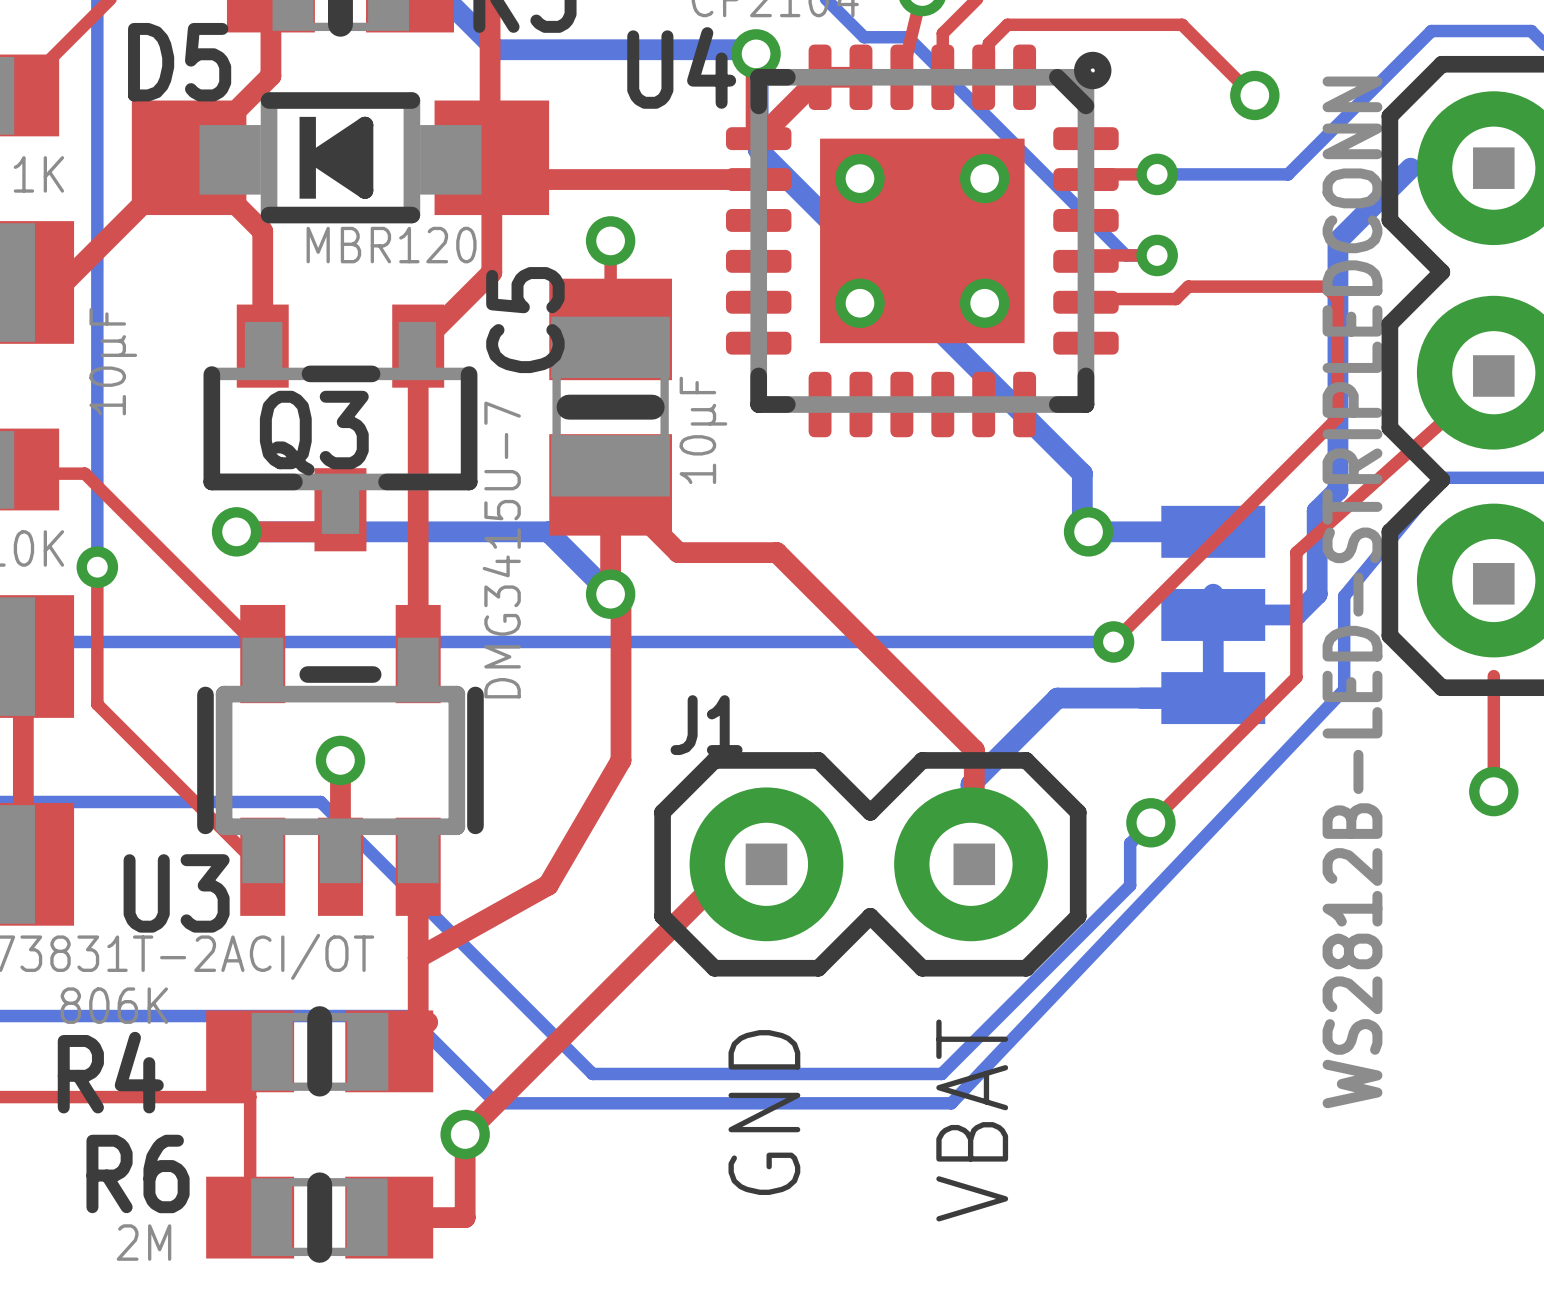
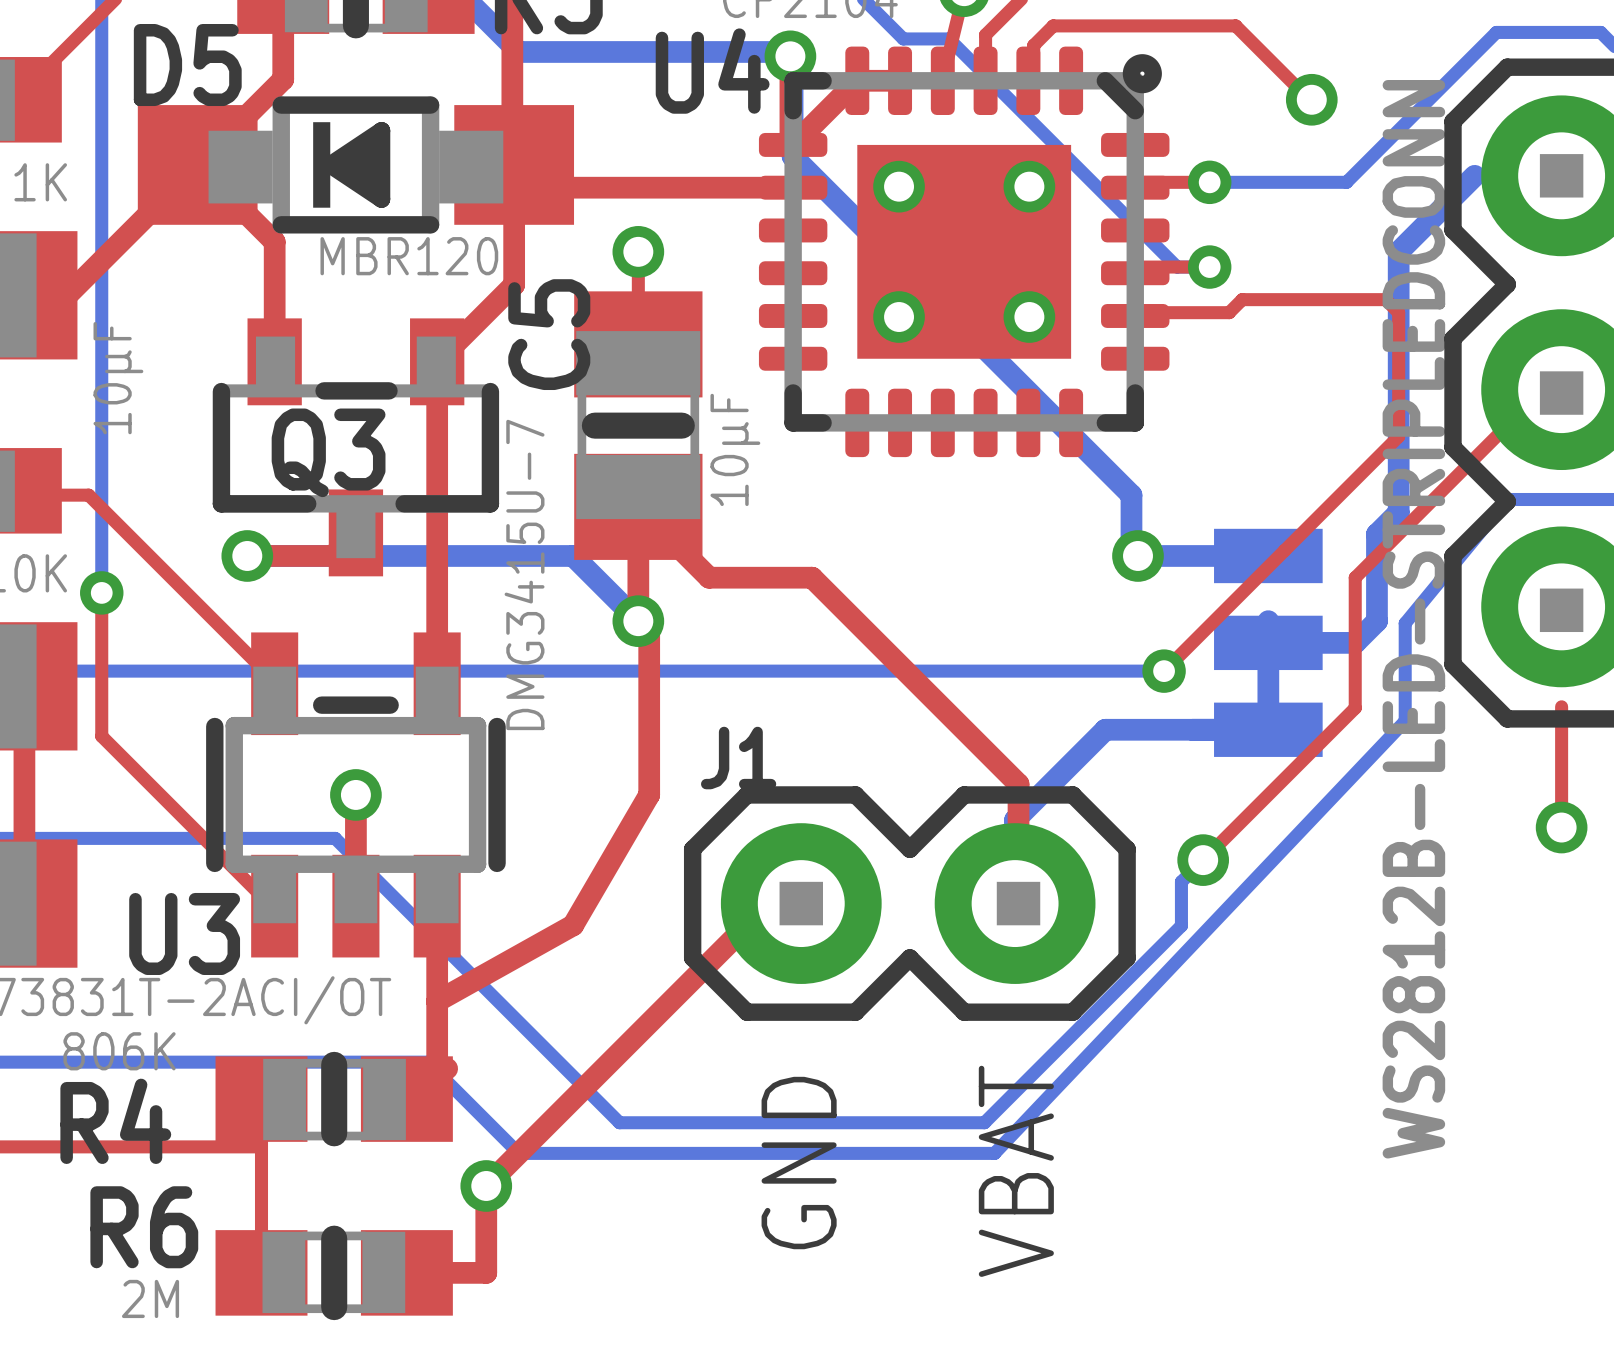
top track: (1493, 375) (1296, 552) -> (1561, 389) (1543, 389) (1355, 577)

